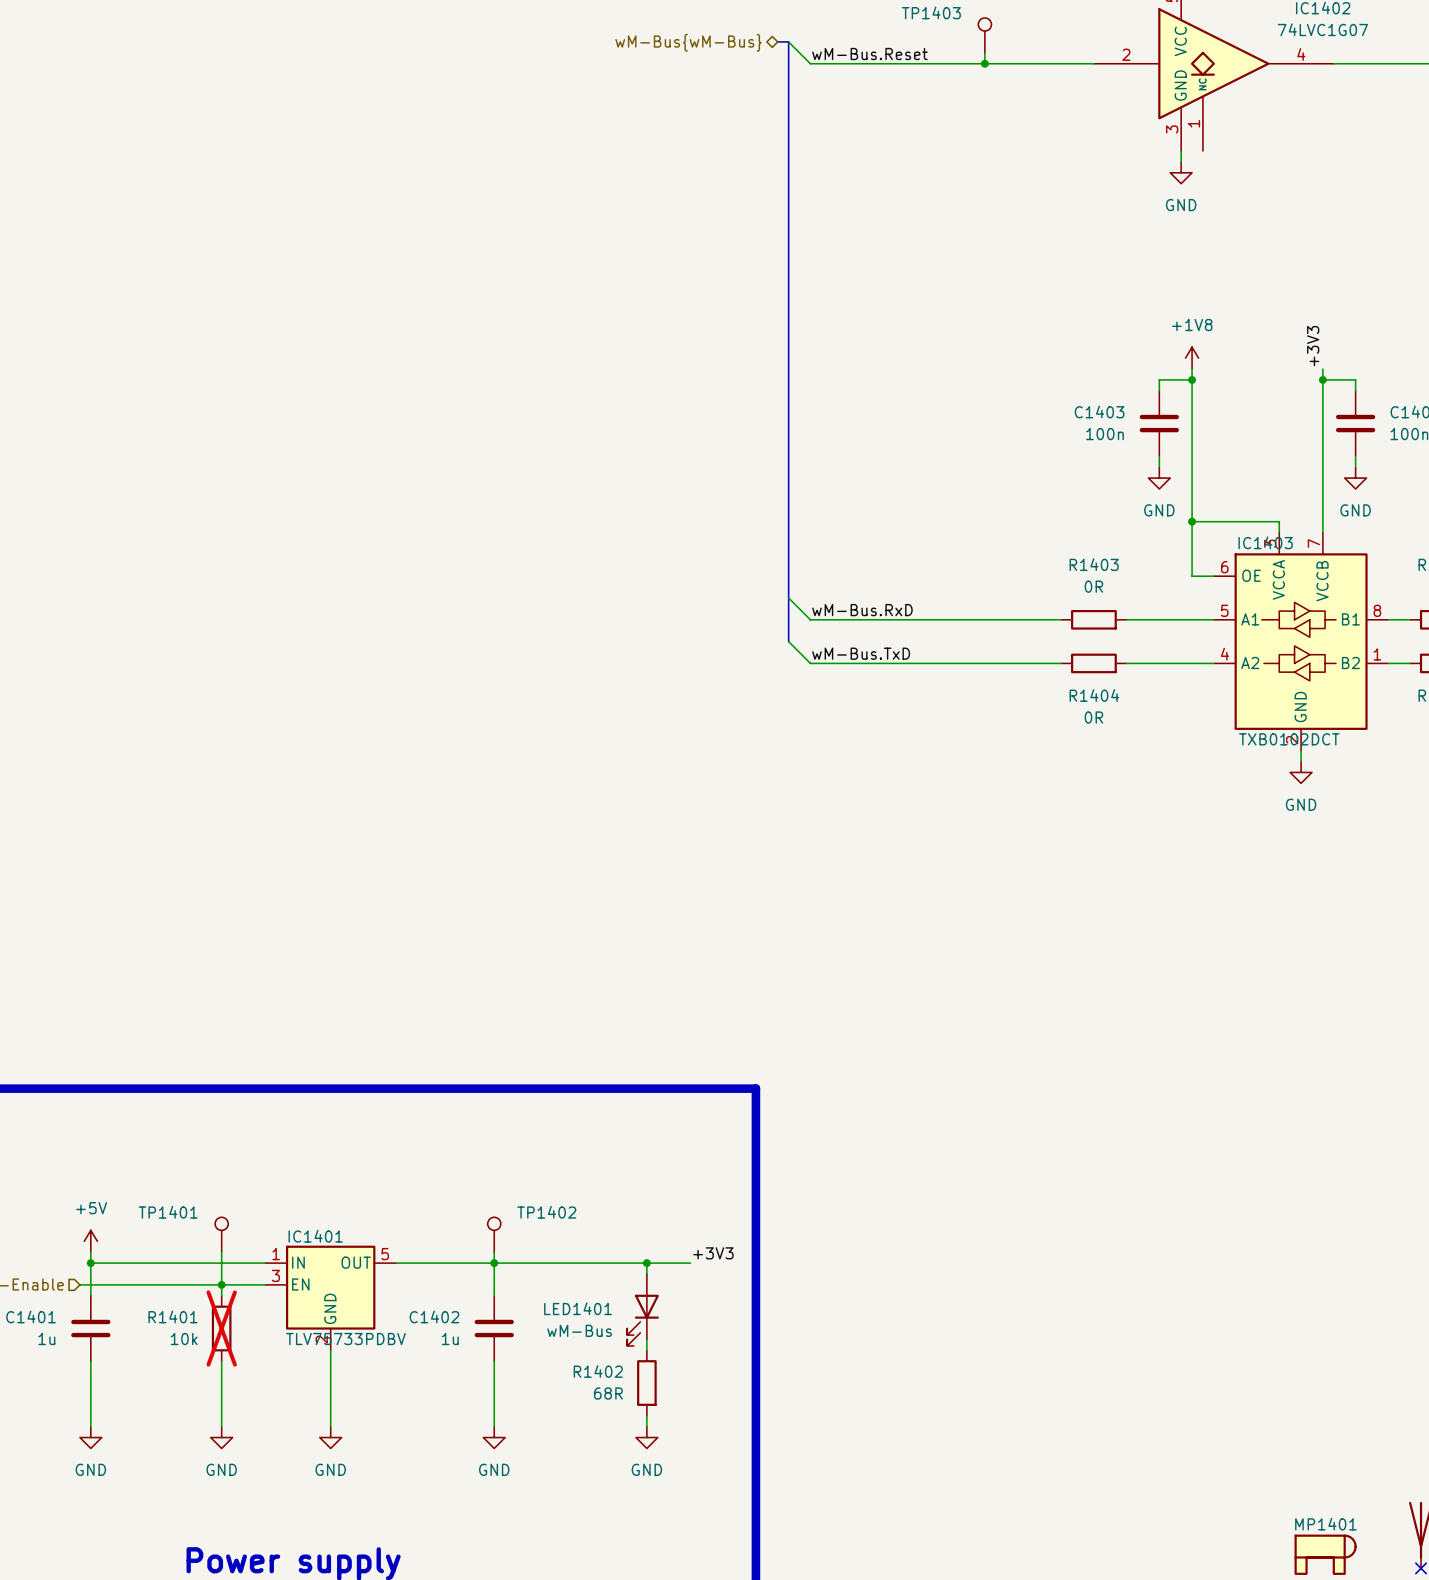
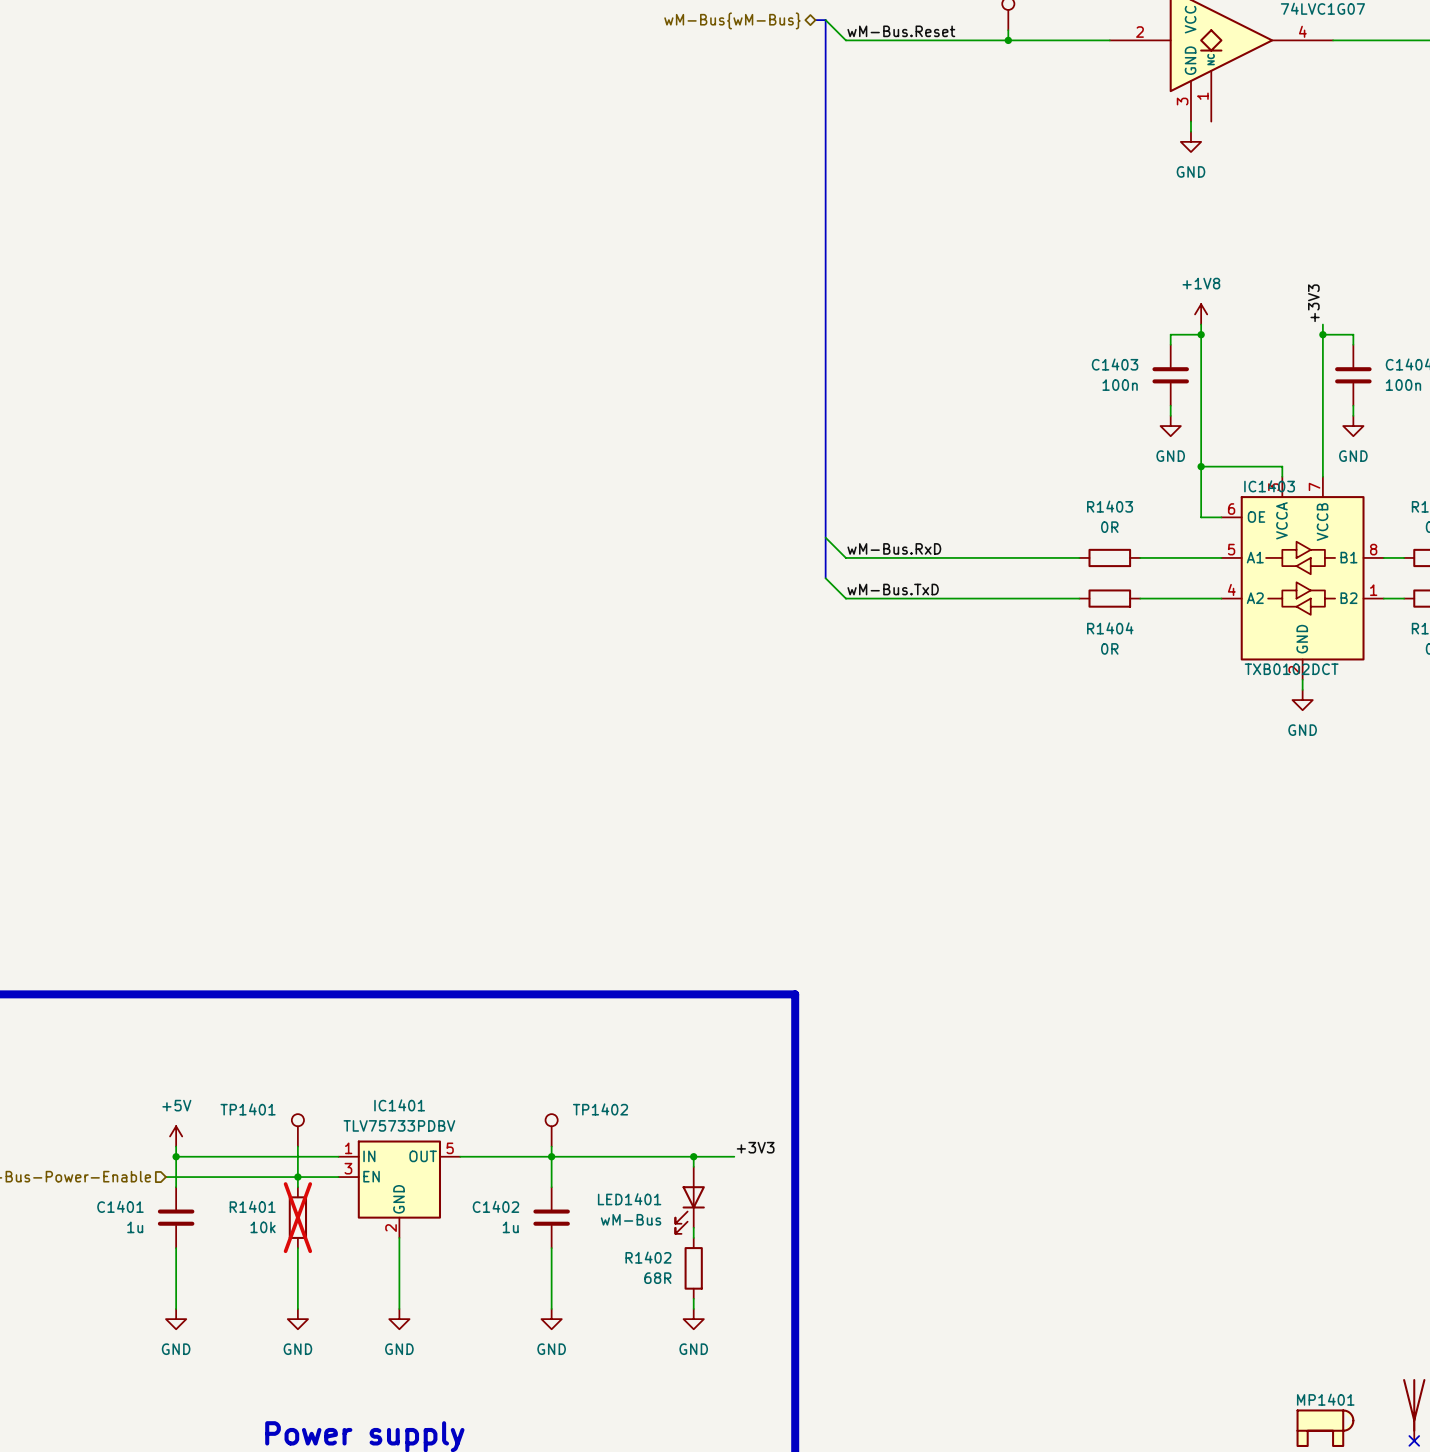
IC1401 name position: IC1401 (315, 1236) -> IC1401 (399, 1105)
IC1401 value position: TLV75733PDBV (345, 1339) -> TLV75733PDBV (399, 1125)

